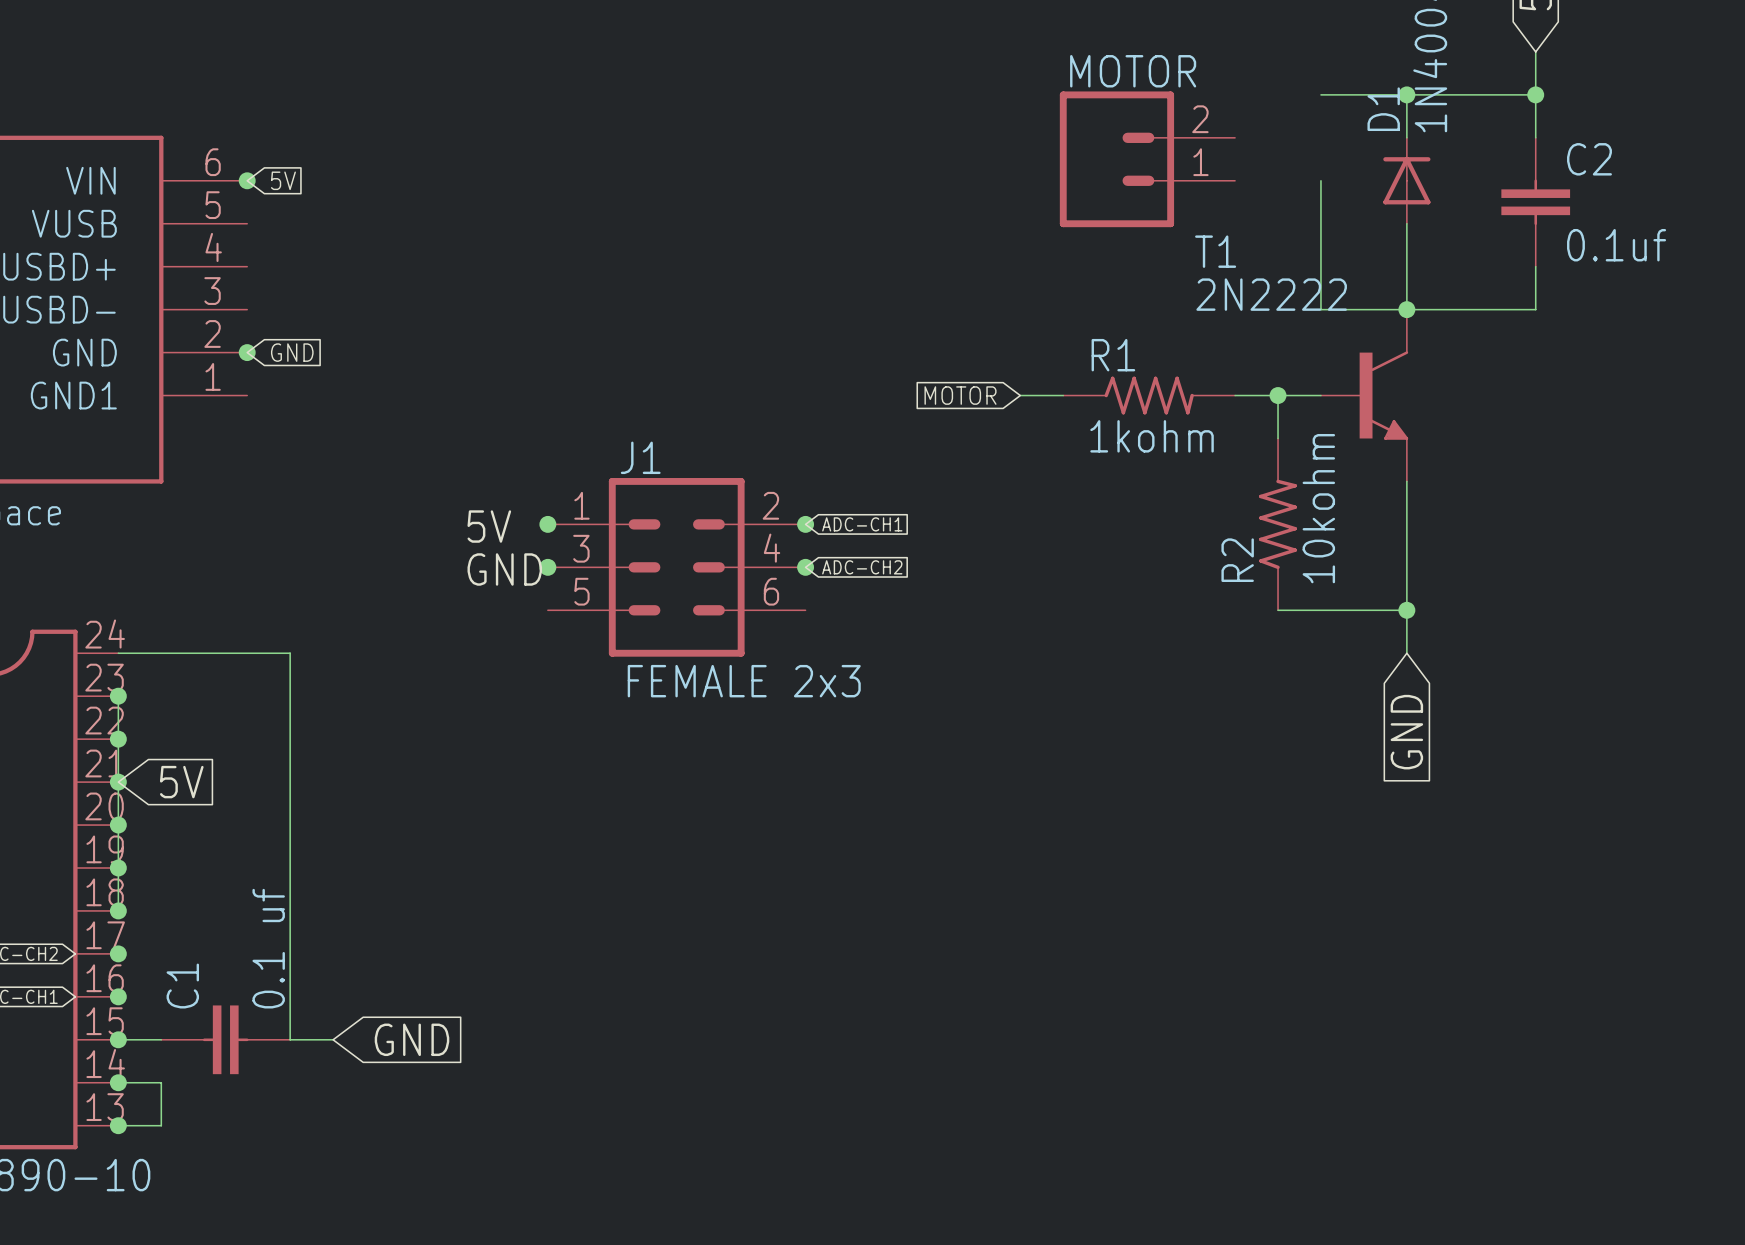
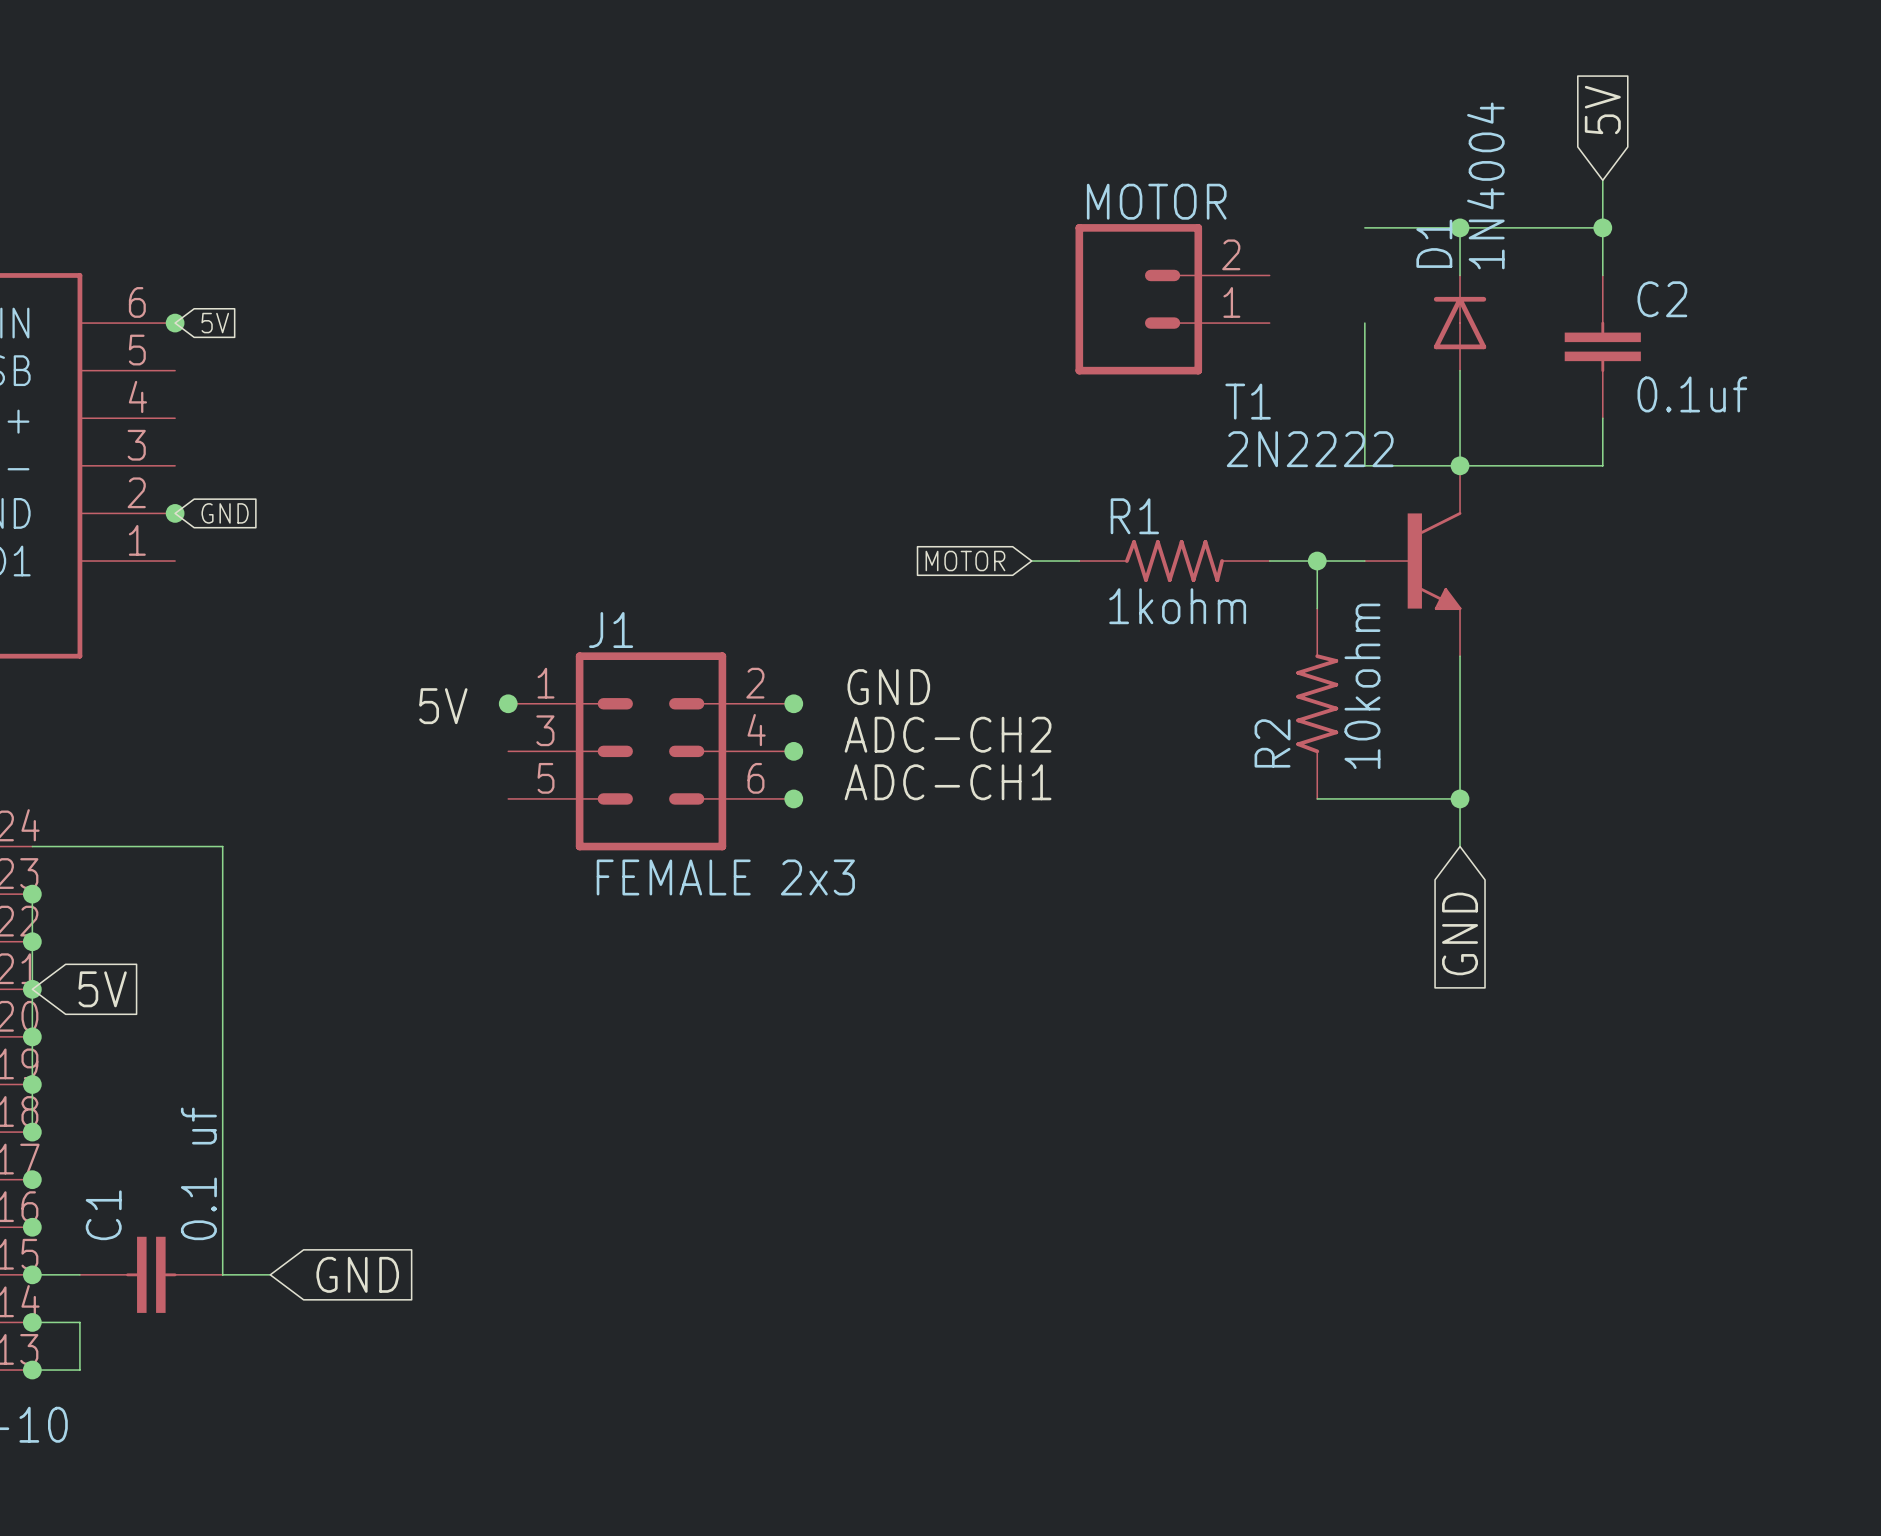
global label: ADC-CH1 (862, 524) -> none
label: none -> ADC-CH2 (948, 734)
junction: (547, 567) -> none
global label: ADC-CH2 (862, 567) -> none
label position: GND (504, 569) -> GND (888, 687)
label: none -> ADC-CH1 (948, 782)
junction: none -> (793, 798)

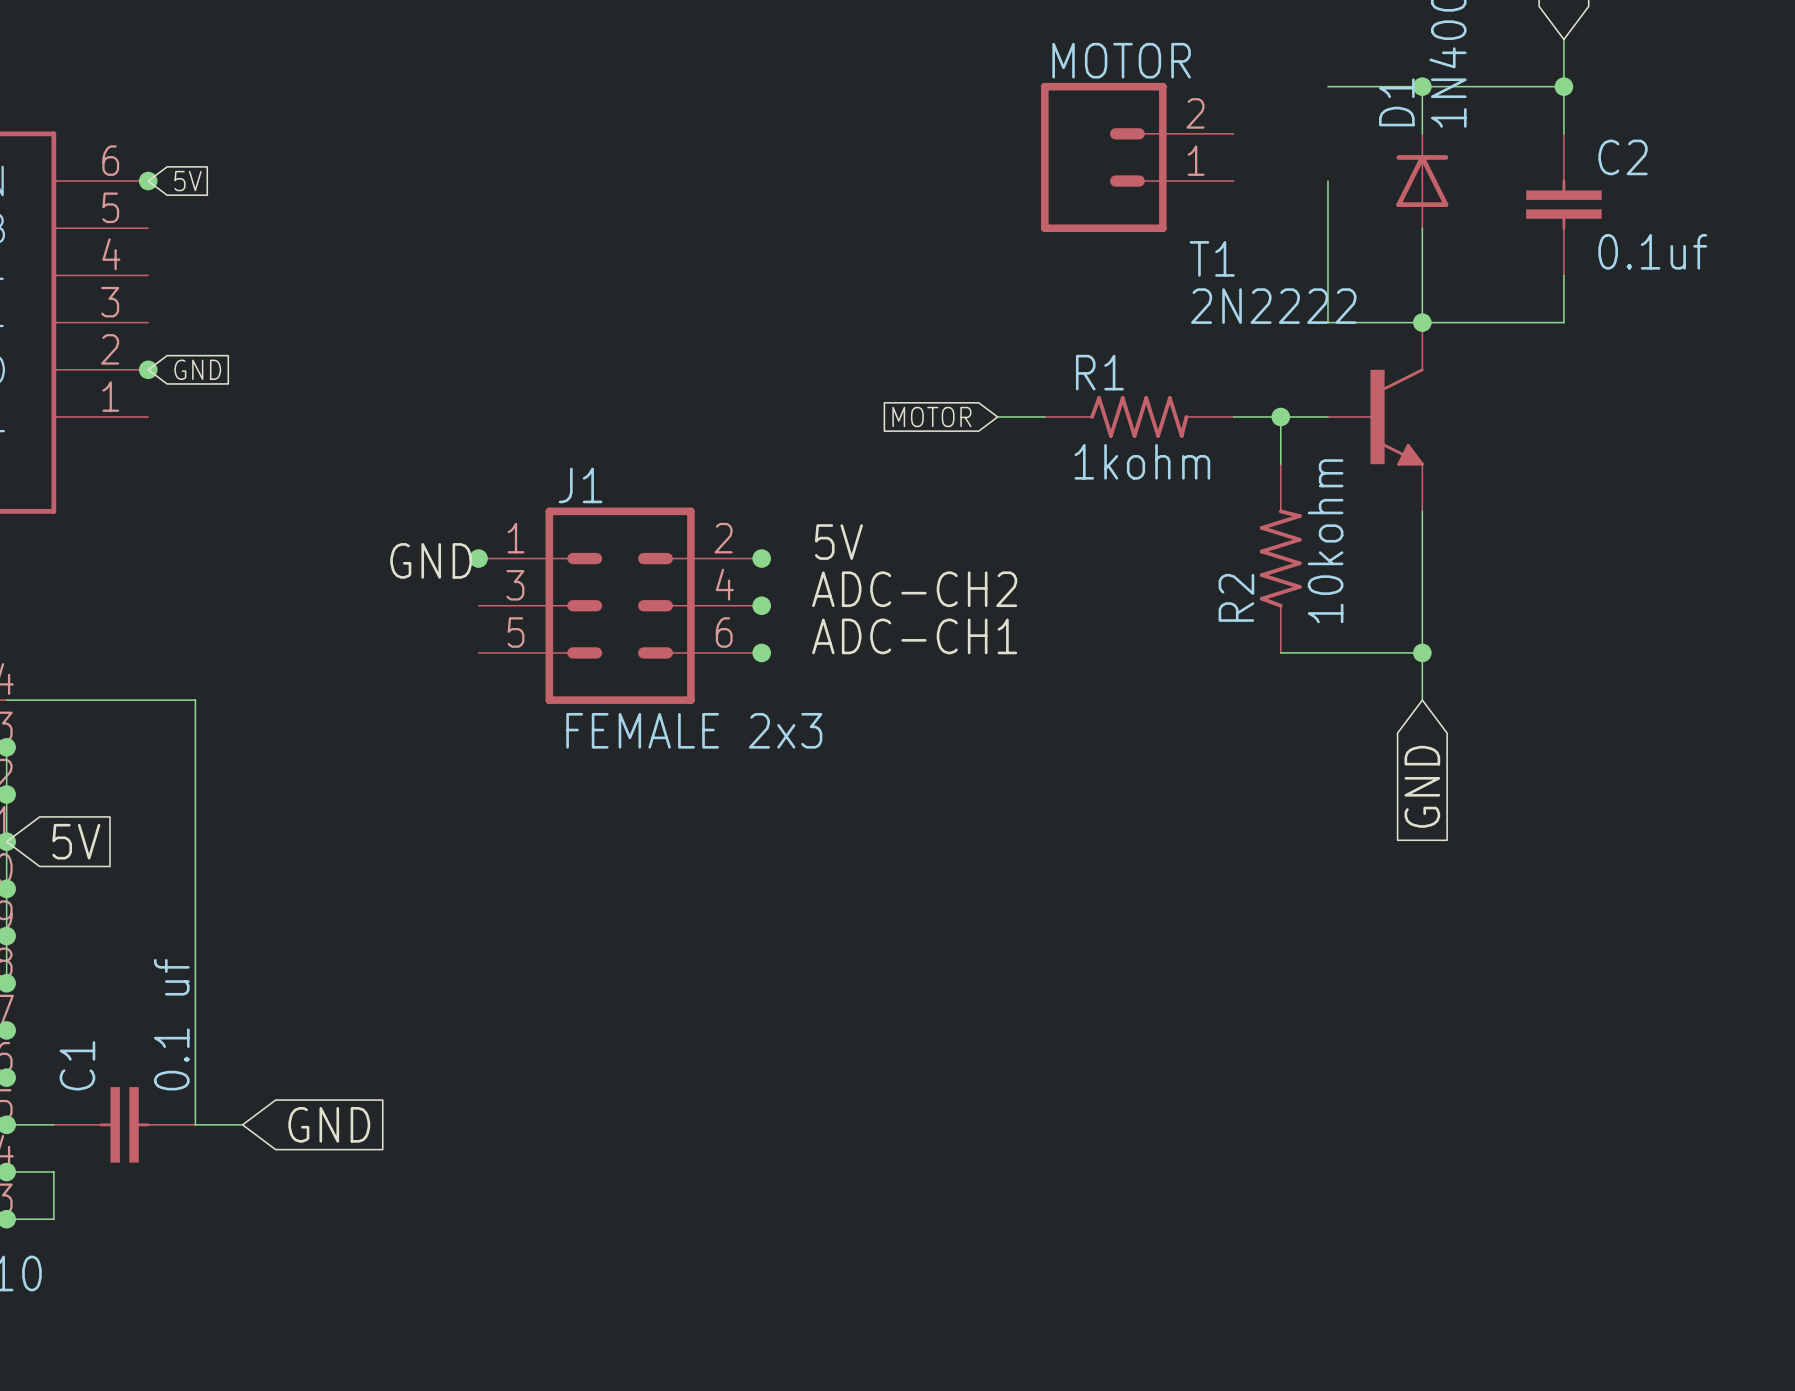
label: GND (888, 687) -> 5V (838, 542)
label: 5V (443, 706) -> GND (431, 560)

